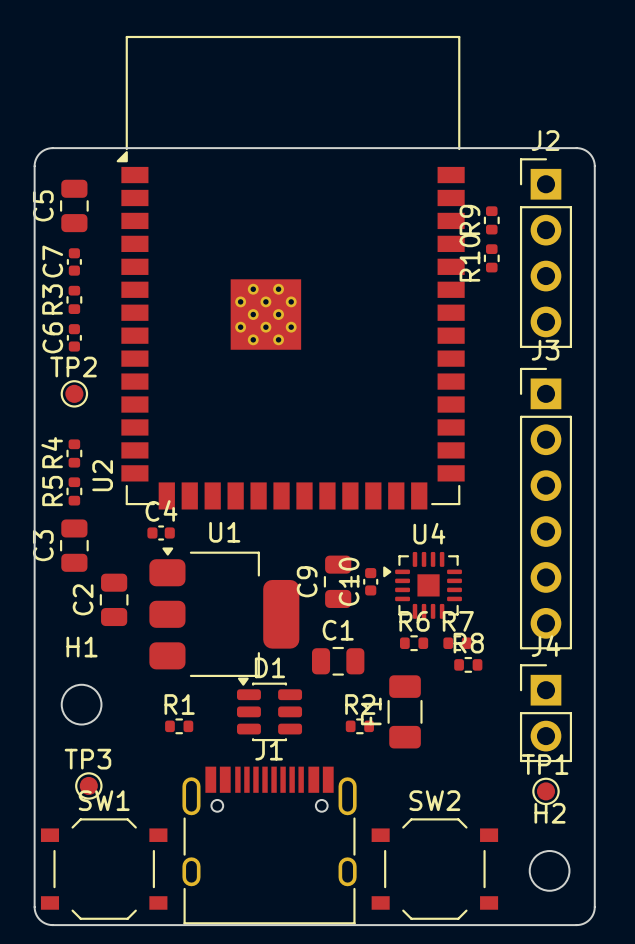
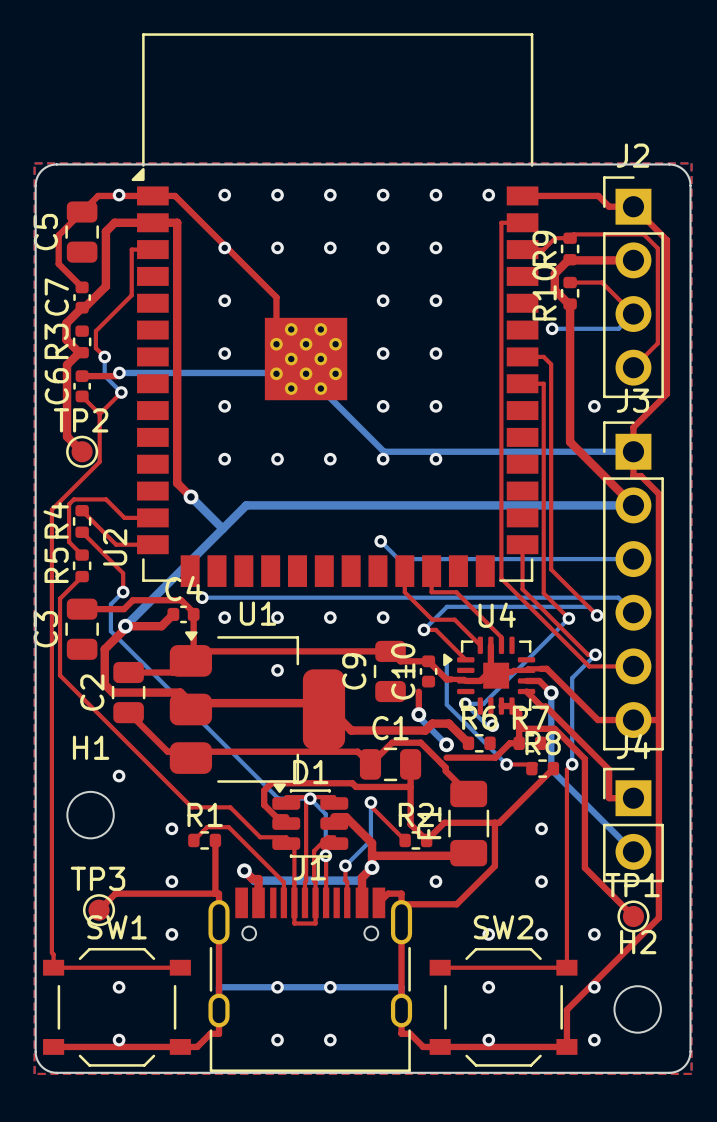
top zone outline: none -> (34, 163) (691, 163) (691, 1073) (34, 1073) (34, 163)
via: none -> (119, 195)
via: none -> (224, 195)
via: none -> (277, 195)
via: none -> (330, 195)
via: none -> (383, 195)
via: none -> (435, 195)
via: none -> (488, 195)
top track: none -> (522, 195) (598, 195) (609, 206) (633, 206) (666, 240) (666, 393) (633, 427) (633, 476) (641, 476) (658, 493) (658, 917) (566, 1009) (566, 1046) (423, 1046) (410, 1033) (401, 1033) (401, 893) (388, 893) (378, 902)
top track: none -> (522, 222) (501, 222) (501, 578) (589, 666) (633, 666)
via: none -> (224, 247)
via: none -> (277, 247)
via: none -> (330, 247)
via: none -> (383, 247)
via: none -> (435, 247)
top track: none -> (152, 249) (131, 249) (131, 295) (95, 331) (95, 348) (104, 356)
top track: none -> (522, 249) (543, 249) (555, 238) (570, 238) (573, 234) (643, 234) (657, 248) (657, 343) (633, 367)
top track: none -> (633, 260) (568, 260) (554, 273) (554, 290) (570, 304) (570, 442) (633, 505)
top track: none -> (570, 282) (602, 282) (633, 314)
top track: none -> (82, 287) (58, 264) (58, 235) (98, 195) (175, 195) (276, 297) (276, 344)
via: none -> (224, 300)
via: none -> (383, 300)
via: none -> (435, 300)
bottom track: none -> (633, 314) (618, 328) (552, 328)
via: none -> (552, 328)
top track: none -> (79, 352) (67, 364) (67, 436) (82, 451)
top track: none -> (79, 352) (66, 339) (66, 323) (105, 286) (105, 231) (114, 222) (177, 222) (177, 483) (191, 496)
via: none -> (224, 353)
via: none -> (383, 353)
via: none -> (435, 353)
bottom track: none -> (104, 356) (104, 375) (121, 392)
via: none -> (104, 356)
top track: none -> (522, 356) (543, 356) (551, 364) (551, 569) (597, 615)
top track: none -> (119, 372) (116, 376) (82, 376)
bottom track: none -> (119, 372) (335, 373)
via: none -> (119, 372)
top track: none -> (522, 383) (543, 383) (543, 593) (568, 618)
bottom track: none -> (291, 388) (320, 388) (383, 451) (633, 451)
top track: none -> (121, 392) (99, 413)
via: none -> (121, 392)
top track: none -> (82, 396) (99, 413) (99, 461) (51, 509) (51, 952) (53, 967) (180, 967)
via: none -> (224, 406)
via: none -> (383, 406)
via: none -> (435, 406)
via: none -> (594, 406)
via: none -> (224, 459)
via: none -> (277, 459)
via: none -> (330, 459)
via: none -> (383, 459)
via: none -> (435, 459)
bottom track: none -> (191, 496) (222, 528)
via: none -> (191, 496)
bottom track: none -> (633, 505) (246, 505) (125, 626)
top track: none -> (82, 510) (116, 544) (152, 544)
top track: none -> (152, 517) (124, 517) (106, 499) (73, 499) (69, 504) (69, 542) (82, 555)
top track: none -> (82, 532) (123, 573) (123, 592)
bottom track: none -> (380, 541) (398, 559) (633, 559)
via: none -> (380, 541)
top track: none -> (522, 544) (522, 589) (588, 654) (595, 654)
top track: none -> (404, 571) (404, 592) (432, 619) (454, 619) (480, 645)
top track: none -> (431, 571) (431, 592) (456, 592) (501, 637) (501, 645)
top track: none -> (82, 576) (60, 598) (60, 675) (191, 807) (230, 807) (260, 837) (286, 837) (294, 845) (294, 923) (315, 923) (314, 850) (327, 837) (334, 837)
bottom track: none -> (123, 592) (110, 604) (110, 631) (278, 798) (310, 798) (325, 814) (325, 855)
via: none -> (123, 592)
bottom track: none -> (202, 597) (618, 597) (633, 612)
via: none -> (202, 597)
top track: none -> (82, 609) (124, 609) (132, 600) (181, 600) (193, 612) (193, 651) (172, 672) (128, 672)
top track: none -> (173, 614) (161, 626) (125, 626) (125, 628) (104, 649) (104, 684) (112, 692) (180, 692) (190, 703) (323, 703) (351, 730) (425, 730) (432, 723) (448, 723) (468, 743)
bottom track: none -> (597, 615) (588, 606) (447, 606) (423, 629)
via: none -> (597, 615)
via: none -> (224, 617)
via: none -> (277, 617)
via: none -> (330, 617)
via: none -> (383, 617)
bottom track: none -> (568, 618) (483, 703) (465, 703) (487, 725) (492, 725)
via: none -> (568, 618)
via: none -> (125, 626)
top track: none -> (423, 629) (435, 629) (465, 659)
via: none -> (423, 629)
top track: none -> (490, 645) (490, 670)
top track: none -> (193, 651) (390, 651) (400, 661) (428, 661) (446, 679) (480, 680) (490, 670)
bottom track: none -> (595, 654) (572, 678) (572, 764)
via: none -> (595, 654)
bottom track: none -> (446, 660) (446, 704) (506, 764)
via: none -> (277, 670)
top track: none -> (490, 670) (496, 675) (499, 671) (546, 668) (597, 720) (658, 720)
top track: none -> (526, 680) (539, 680) (551, 692)
top track: none -> (526, 691) (541, 706) (545, 706) (609, 769) (609, 798) (633, 798)
top track: none -> (418, 691) (418, 714)
bottom track: none -> (551, 692) (551, 769) (633, 851)
via: none -> (551, 692)
via: none -> (465, 703)
top track: none -> (501, 706) (512, 706) (519, 713) (519, 743) (509, 743) (495, 757) (446, 757)
top track: none -> (128, 712) (167, 751) (357, 751) (370, 764) (392, 742) (420, 742) (468, 793)
bottom track: none -> (418, 714) (418, 717) (446, 744)
via: none -> (418, 714)
via: none -> (492, 725)
top track: none -> (519, 728) (554, 728) (584, 759) (584, 867) (633, 916)
via: none -> (446, 744)
top track: none -> (410, 764) (410, 824) (426, 840) (444, 822) (499, 822) (553, 768)
top track: none -> (506, 764) (536, 764)
via: none -> (506, 764)
top track: none -> (572, 764) (566, 769) (566, 967) (440, 967)
via: none -> (572, 764)
via: none -> (119, 776)
top track: none -> (410, 786) (356, 786) (352, 783) (271, 783) (264, 790) (264, 804) (276, 817) (286, 817)
top track: none -> (286, 797) (334, 797)
top track: none -> (306, 797) (304, 902)
via: none -> (310, 798)
top track: none -> (370, 802) (370, 806) (405, 840)
bottom track: none -> (370, 802) (370, 840) (345, 865)
via: none -> (370, 802)
top track: none -> (334, 817) (346, 817) (372, 843) (372, 867) (362, 877) (362, 902)
top track: none -> (494, 822) (494, 866) (456, 904) (401, 904)
via: none -> (171, 828)
via: none -> (541, 828)
top track: none -> (193, 840) (207, 827) (228, 827) (283, 882) (283, 902)
top track: none -> (215, 840) (215, 893)
top track: none -> (468, 853) (466, 855) (372, 855)
top track: none -> (325, 855) (326, 902)
via: none -> (325, 855)
top track: none -> (345, 865) (347, 902)
via: none -> (345, 865)
bottom track: none -> (372, 867) (358, 880) (254, 880) (244, 870)
via: none -> (372, 867)
top track: none -> (244, 870) (252, 879) (258, 879) (258, 902)
via: none -> (244, 870)
via: none -> (171, 881)
via: none -> (435, 881)
via: none -> (541, 881)
top track: none -> (99, 910) (115, 893) (219, 893) (219, 1033) (210, 1033) (197, 1046) (53, 1046)
via: none -> (171, 934)
via: none -> (488, 934)
via: none -> (541, 934)
via: none -> (594, 934)
via: none -> (119, 987)
via: none -> (277, 987)
via: none -> (330, 987)
via: none -> (488, 987)
via: none -> (594, 987)
bottom track: none -> (219, 1010) (219, 987) (401, 987) (401, 1010)
via: none -> (119, 1040)
via: none -> (277, 1040)
via: none -> (330, 1040)
via: none -> (488, 1040)
via: none -> (594, 1040)

